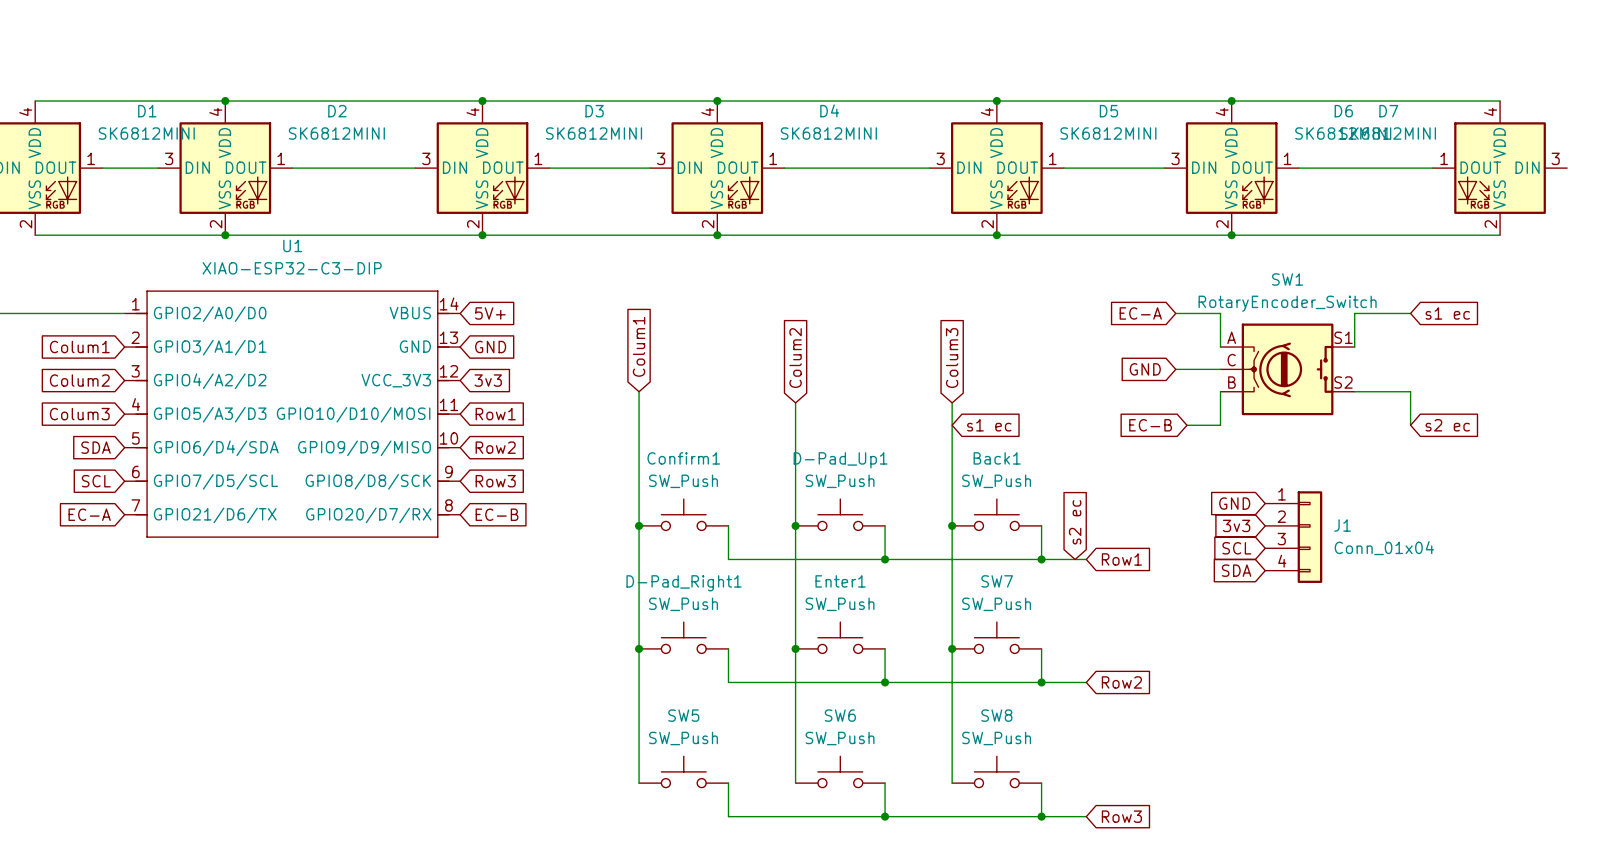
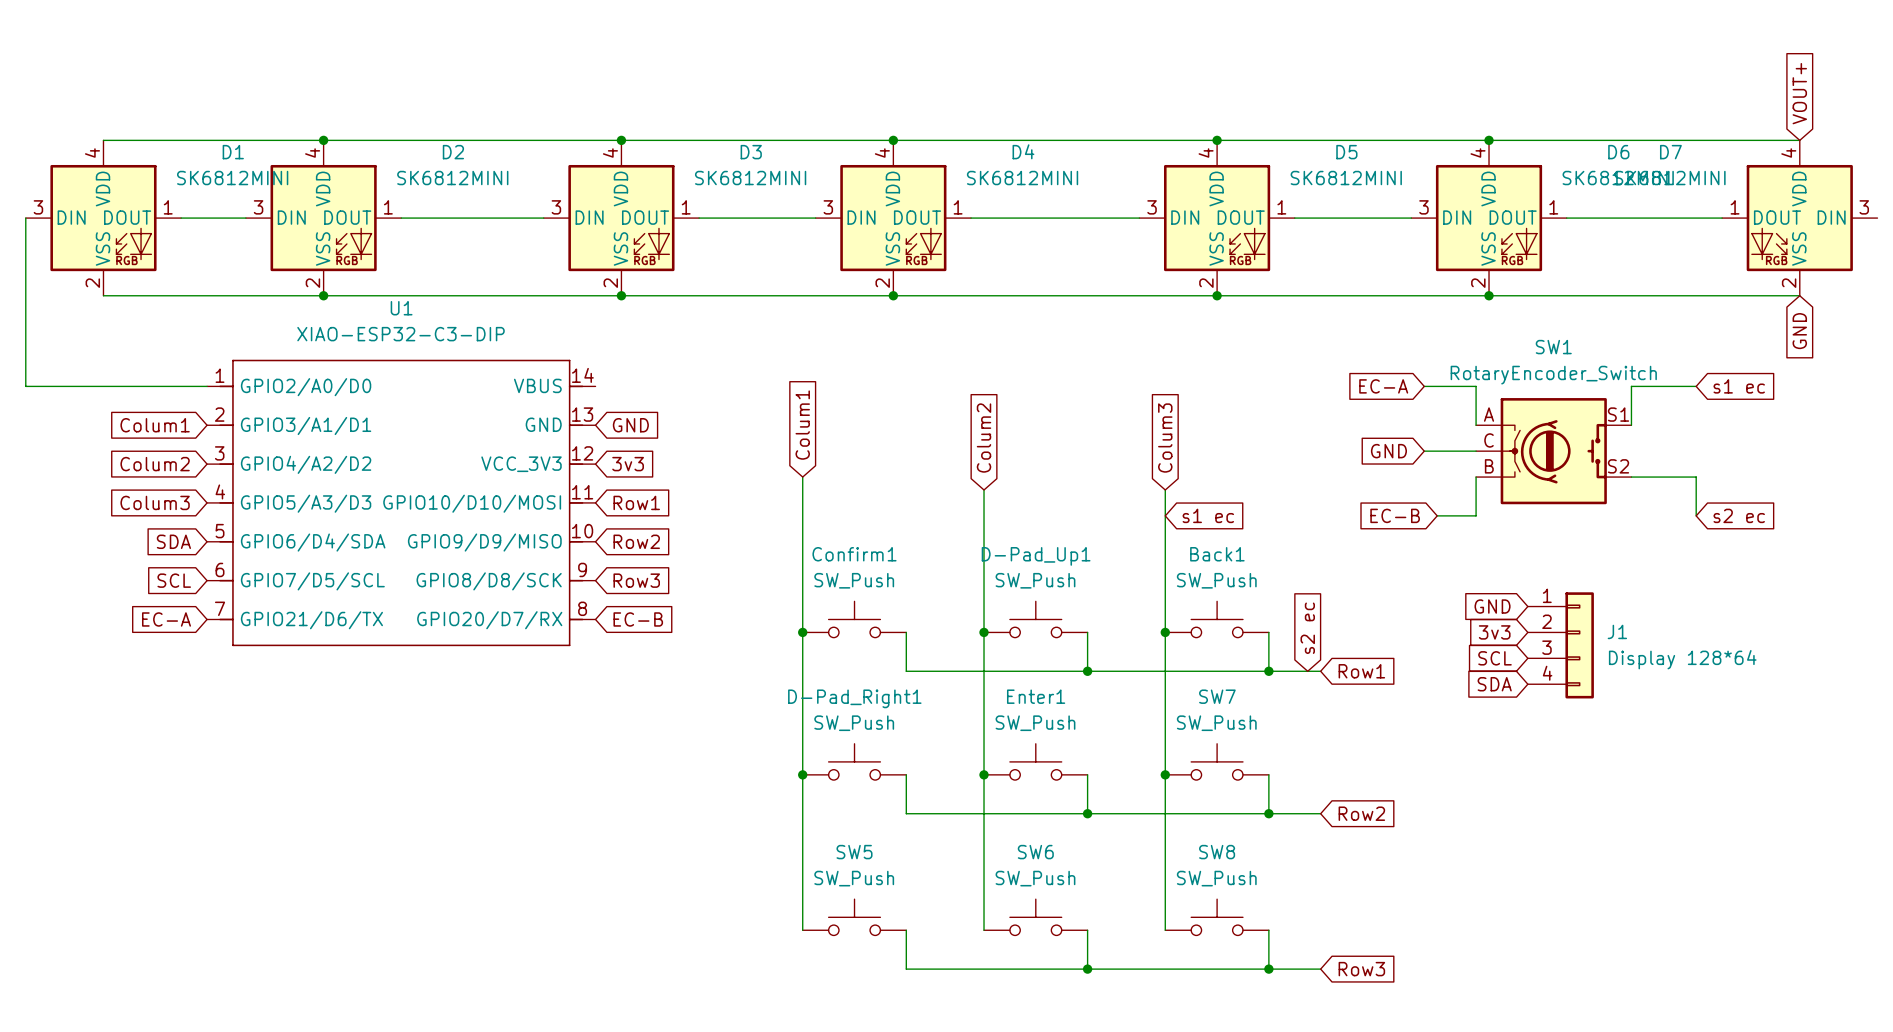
global label: none -> VOUT+ (1799, 93)
global label: none -> GND (1799, 331)
global label: 5V+ (490, 313) -> none
J1 value: Conn_01x04 (1384, 548) -> Display 128*64 (1682, 659)

